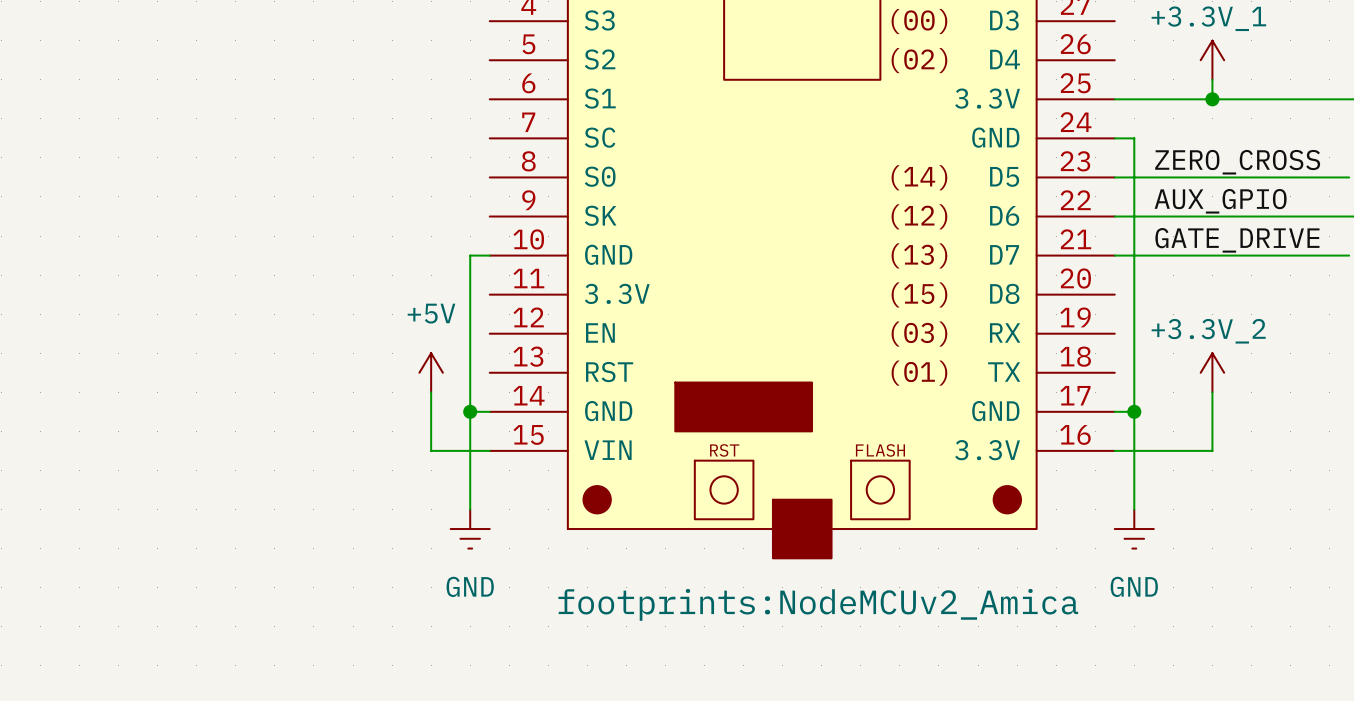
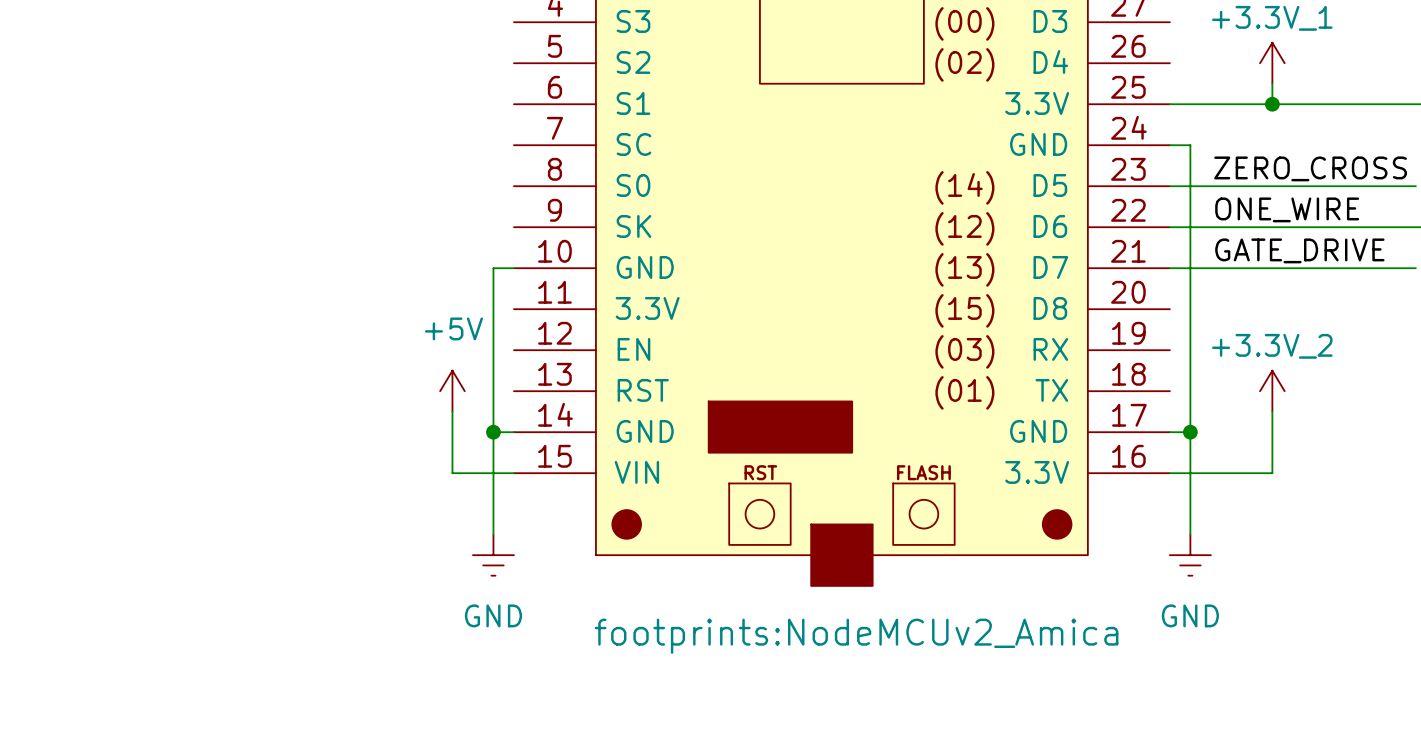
label: AUX_GPIO (1220, 201) -> ONE_WIRE (1287, 209)

